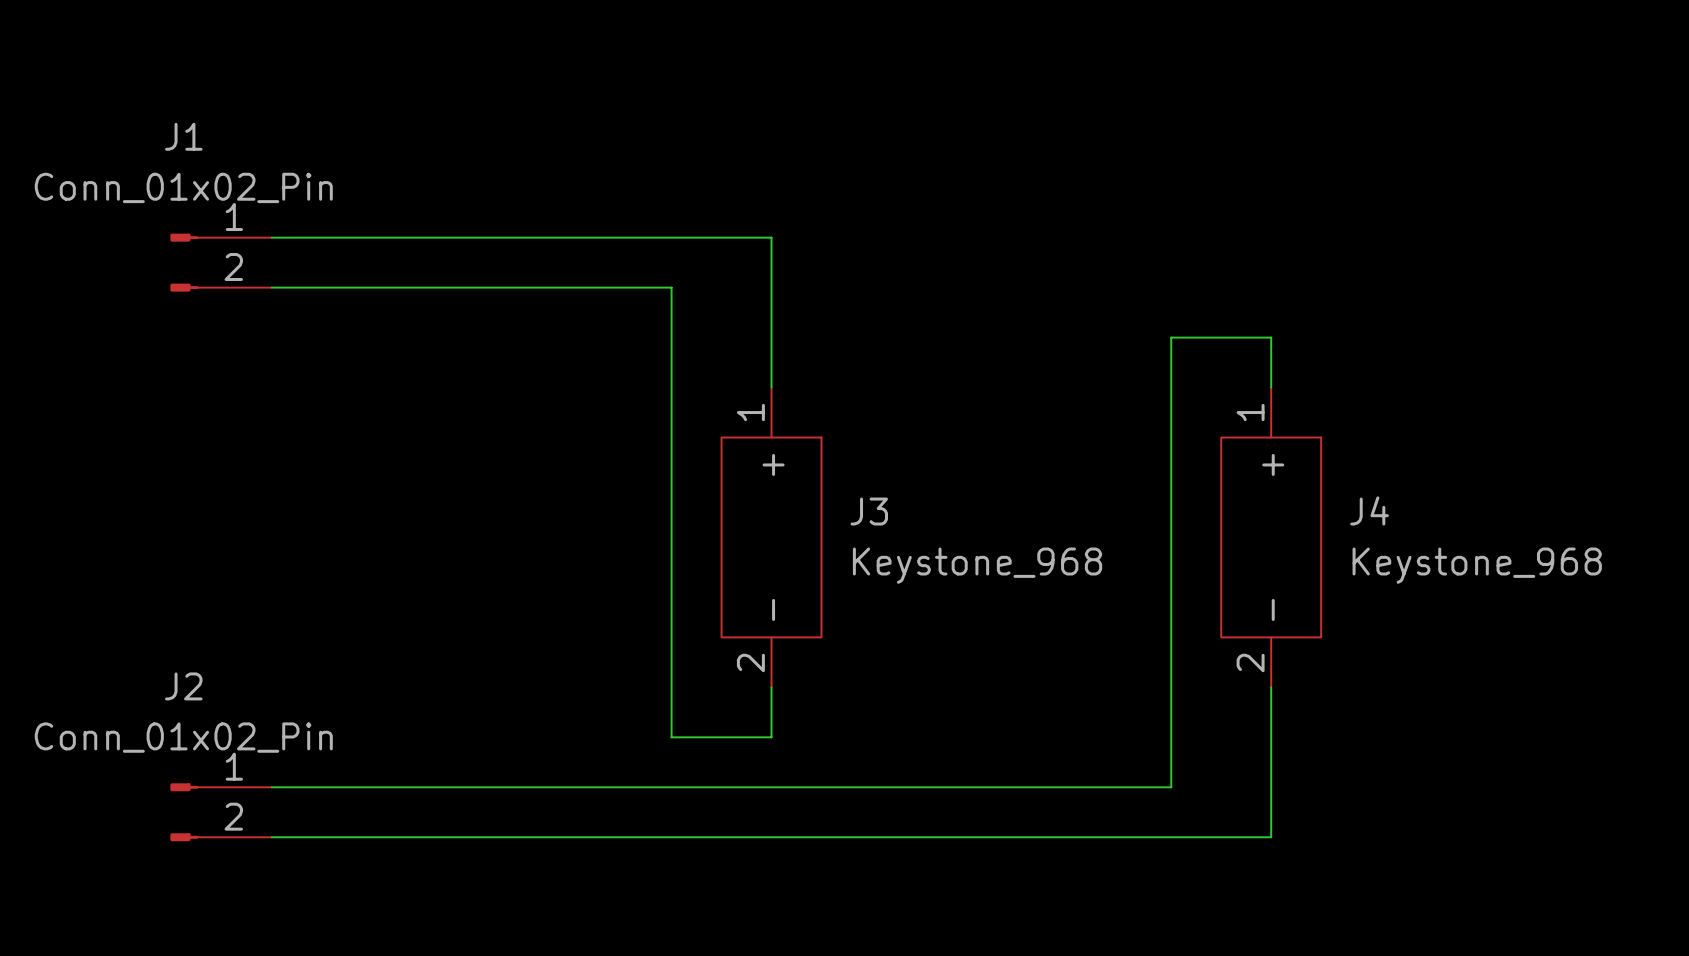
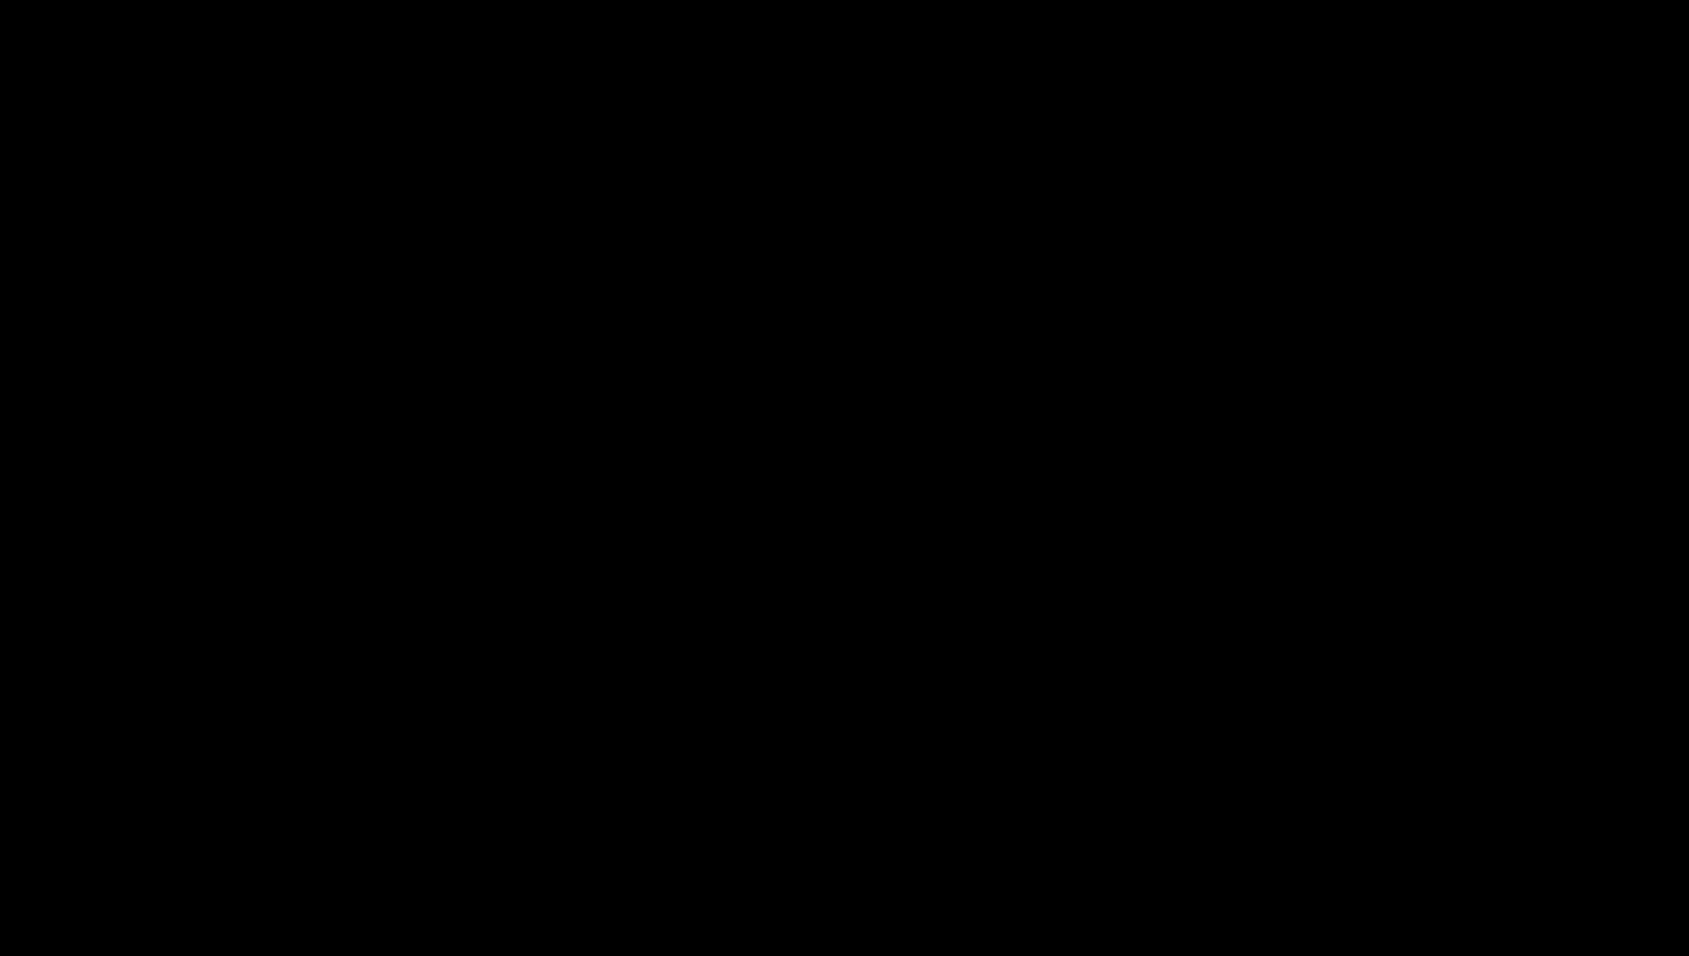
wire: (271, 237) (771, 237) (771, 387) -> none
J1: Conn_01x02_Pin (221, 262) -> none
wire: (271, 287) (671, 287) (671, 737) (771, 737) (771, 687) -> none
wire: (1271, 387) (1271, 337) (1171, 337) (1171, 787) (271, 787) -> none
J3: Keystone_968 (771, 537) -> none
J4: Keystone_968 (1271, 537) -> none
wire: (1271, 687) (1271, 837) (271, 837) -> none
J2: Conn_01x02_Pin (221, 812) -> none

